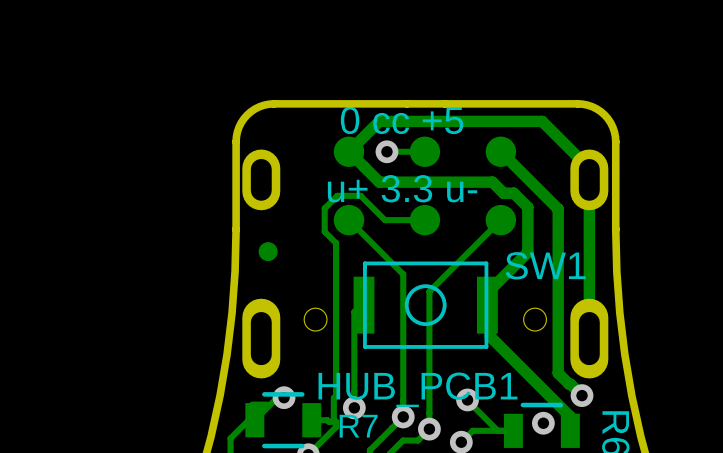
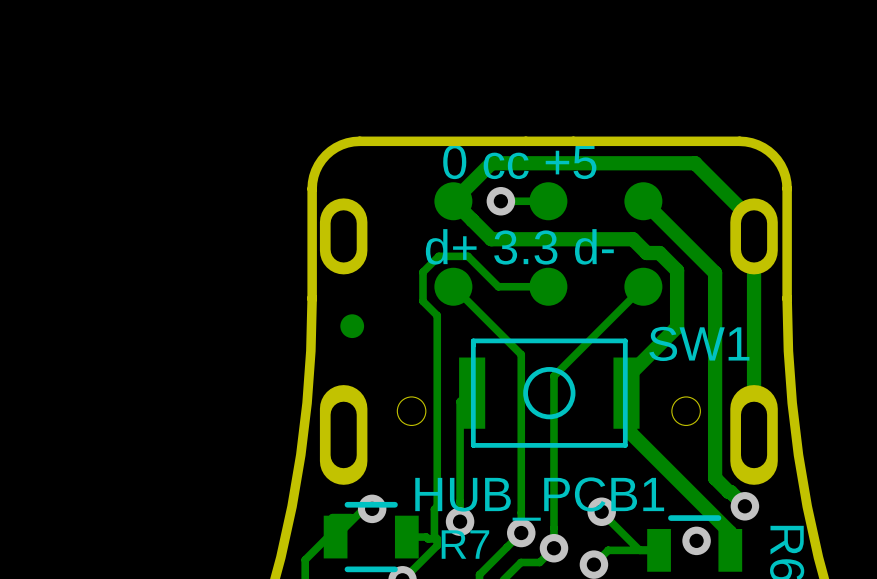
text: u+ 3.3 u- (402, 188) -> d+ 3.3 d- (519, 246)

